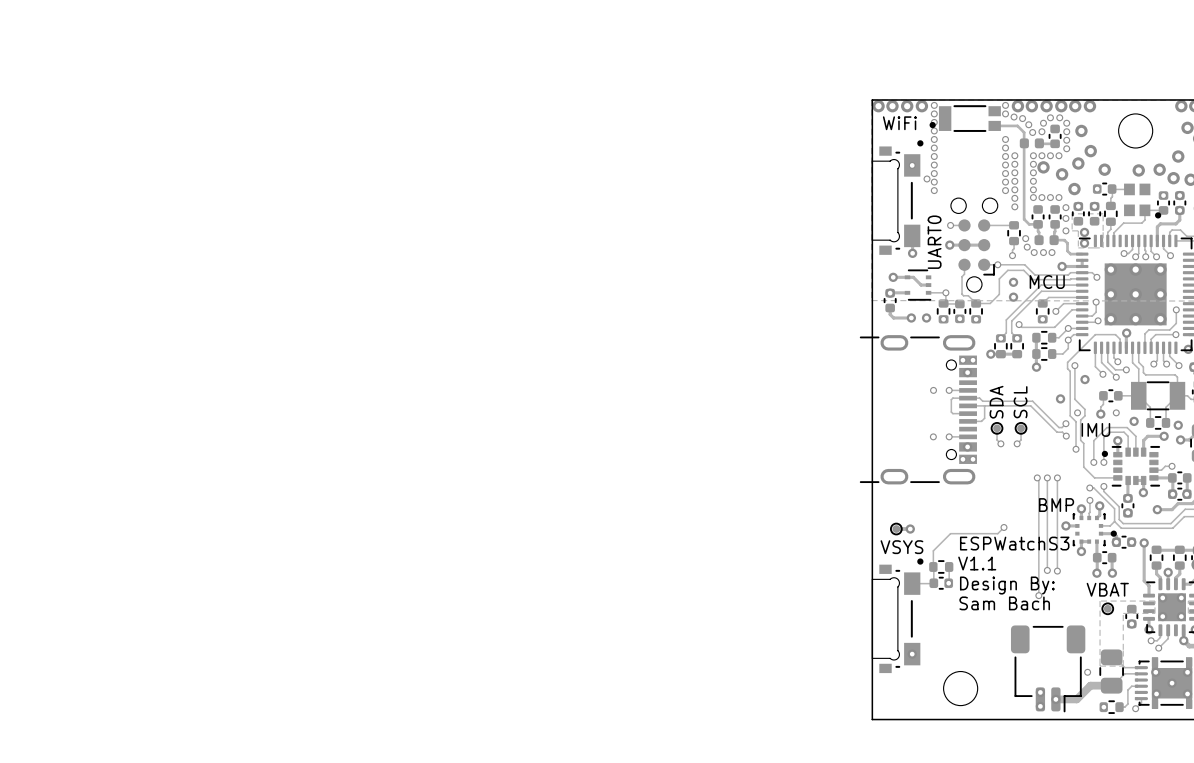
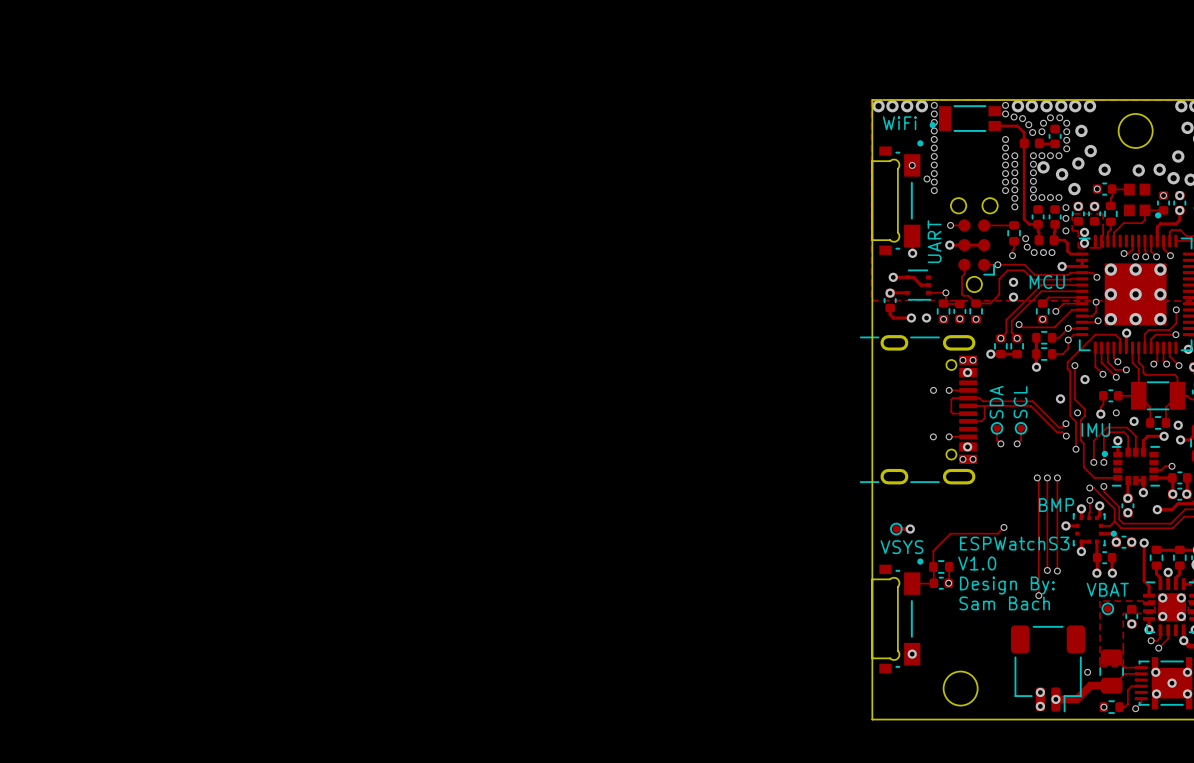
part value: UART0 (934, 242) -> UART (934, 241)
text: V1.1 (977, 563) -> V1.0 (977, 563)

